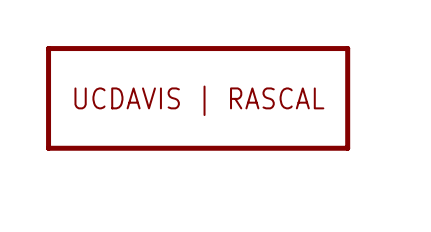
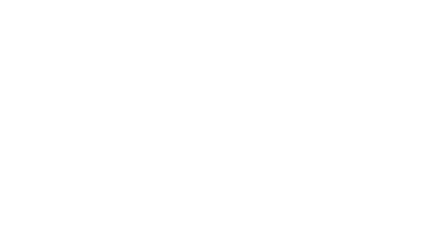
part: (198, 98) -> none

